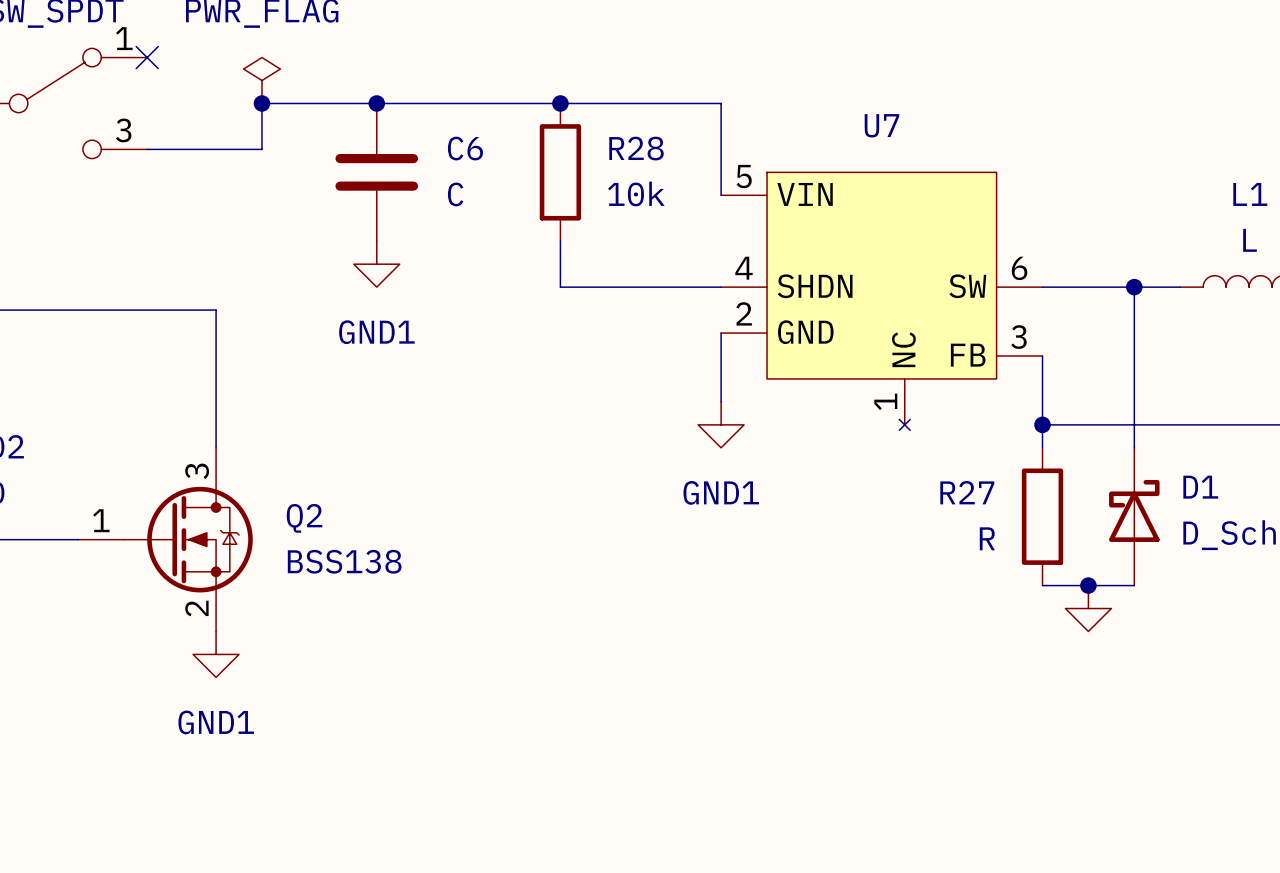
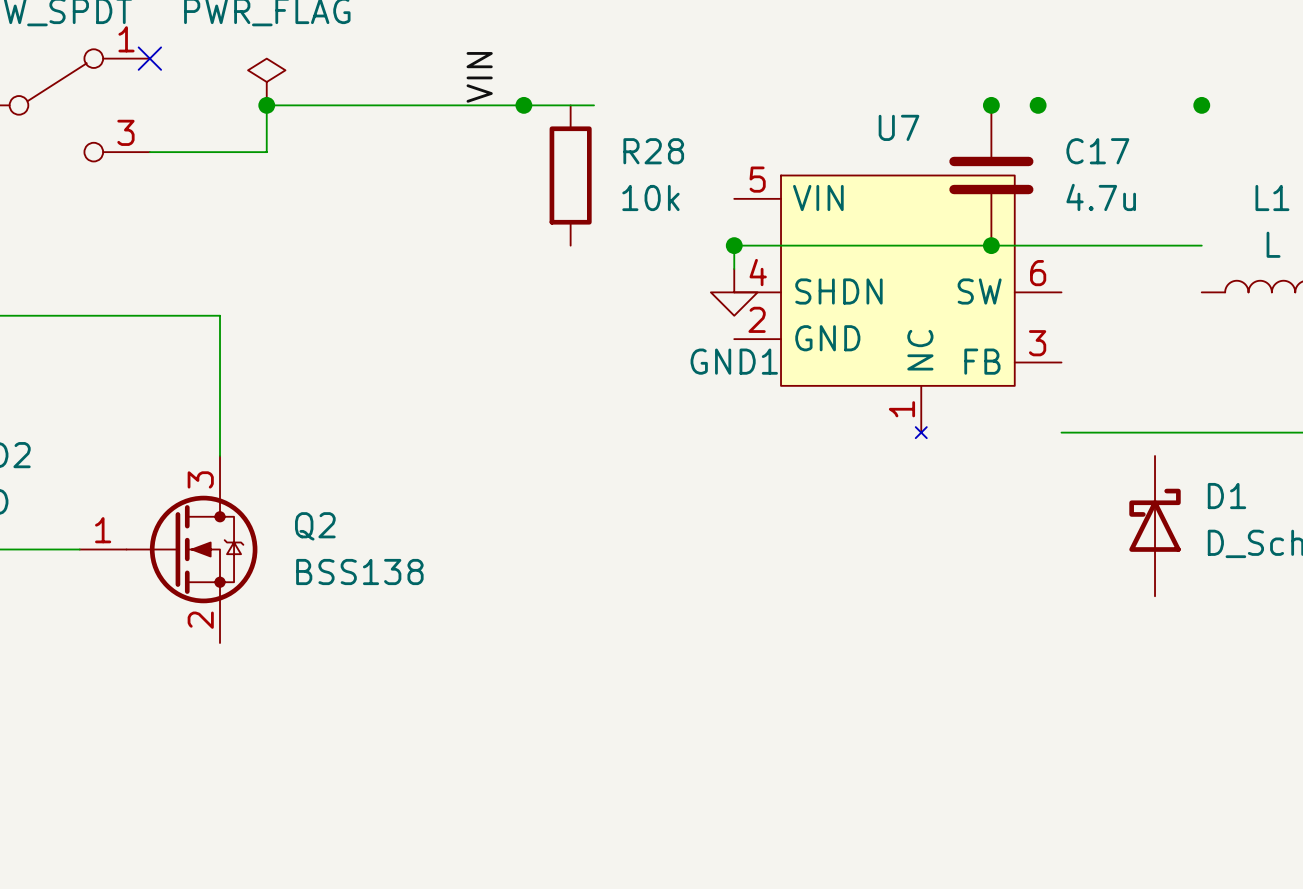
label: none -> VIN (479, 77)
junction: (376, 103) -> none
junction position: (560, 103) -> (523, 105)
wire: (583, 103) (721, 103) (721, 195) -> none
junction: none -> (991, 105)
junction: none -> (1038, 105)
junction: none -> (1201, 105)
C6: C (376, 172) -> none
C17: none -> 4.7u (991, 175)
wire: (560, 241) (560, 287) (721, 287) -> none
junction: none -> (734, 245)
junction: none -> (991, 245)
wire: none -> (1201, 245) (734, 245) (734, 269)
power symbol: GND1 (376, 264) -> none
wire: (1042, 287) (1180, 287) -> none
wire: (1134, 287) (1134, 447) -> none
junction: (1134, 287) -> none
wire: (721, 333) (721, 401) -> none
wire: (1042, 356) (1042, 447) -> none
power symbol position: GND1 (721, 424) -> GND1 (734, 292)
junction: (1042, 424) -> none
R27: R (1042, 516) -> none
wire: (1042, 585) (1134, 585) -> none
junction: (1088, 585) -> none
power symbol: (1088, 608) -> none
power symbol: GND1 (216, 654) -> none

